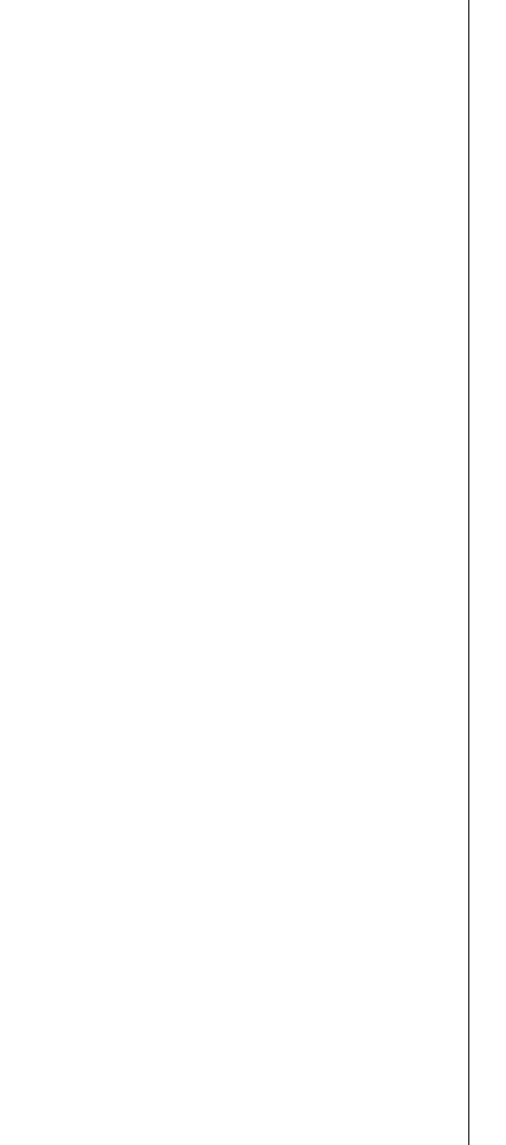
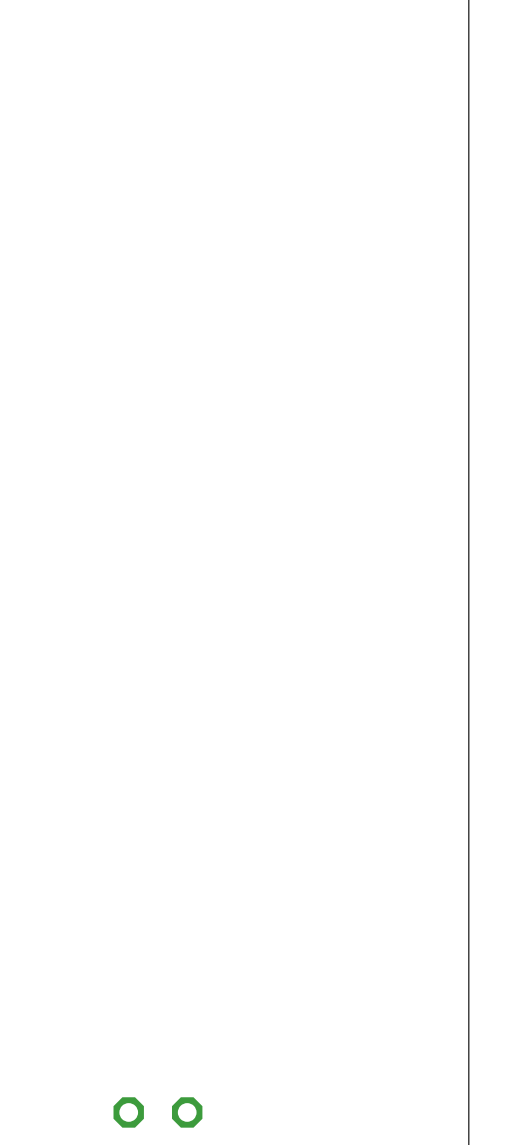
part: none -> (157, 1112)

